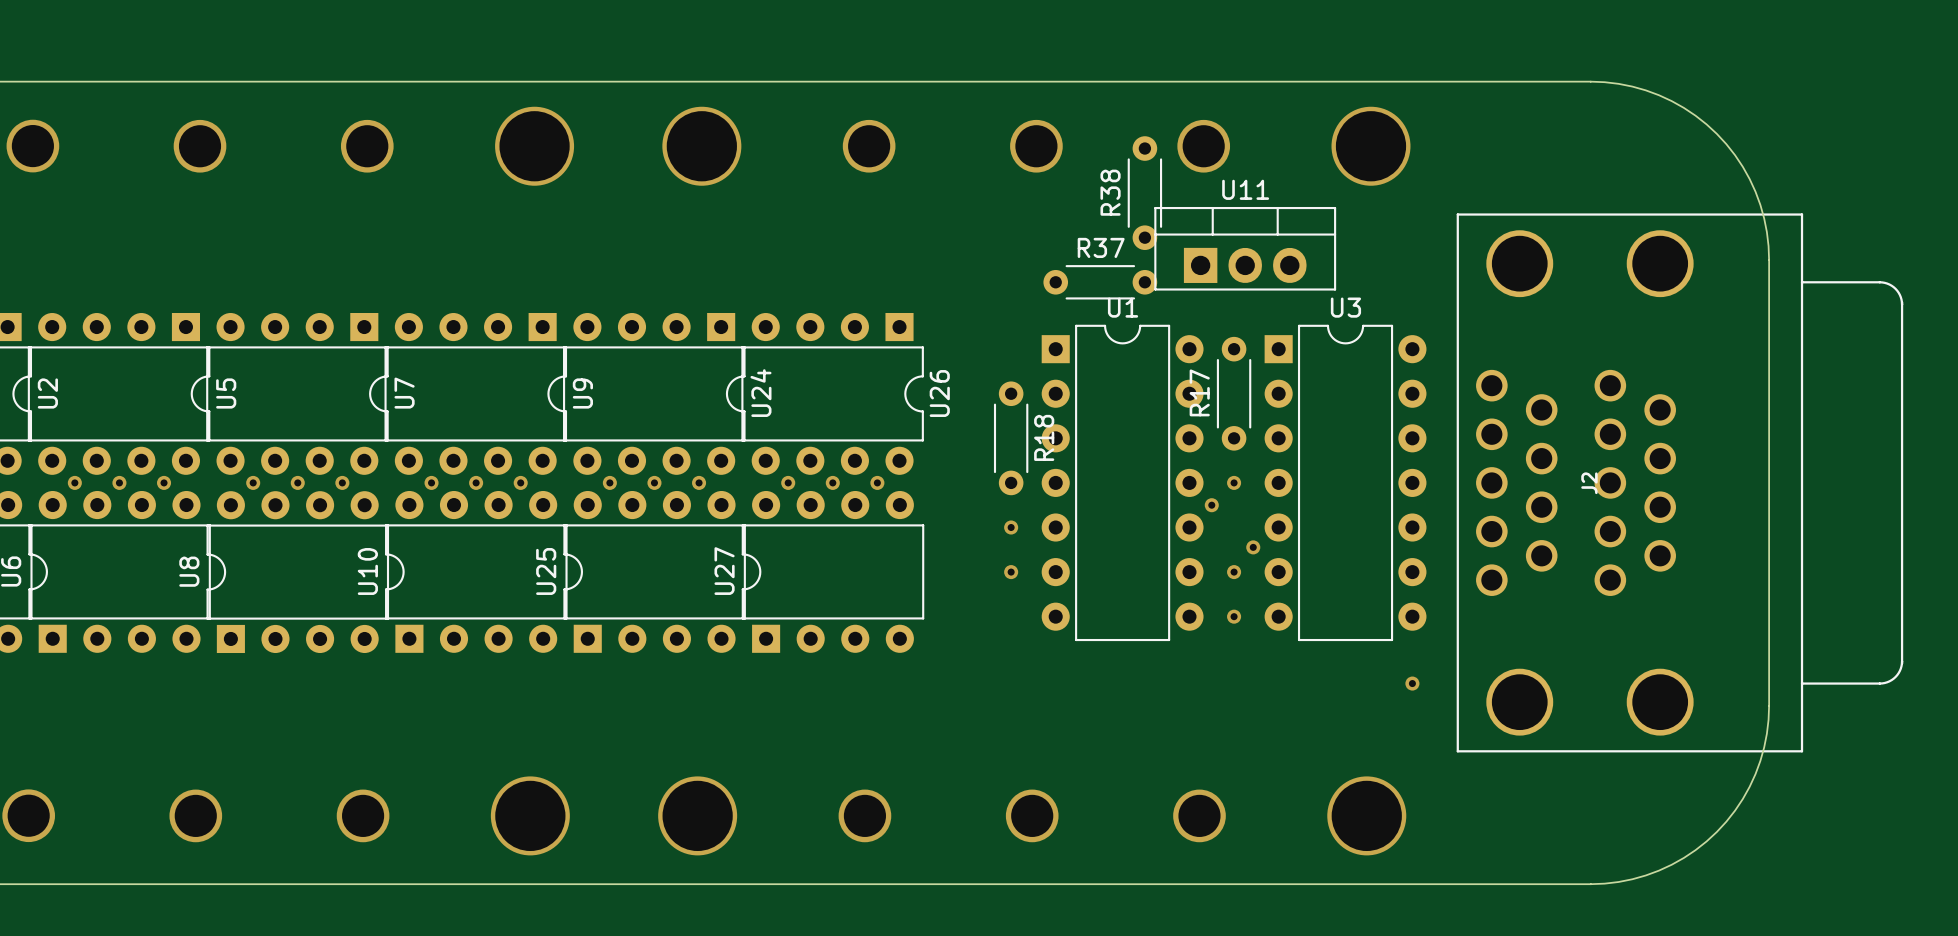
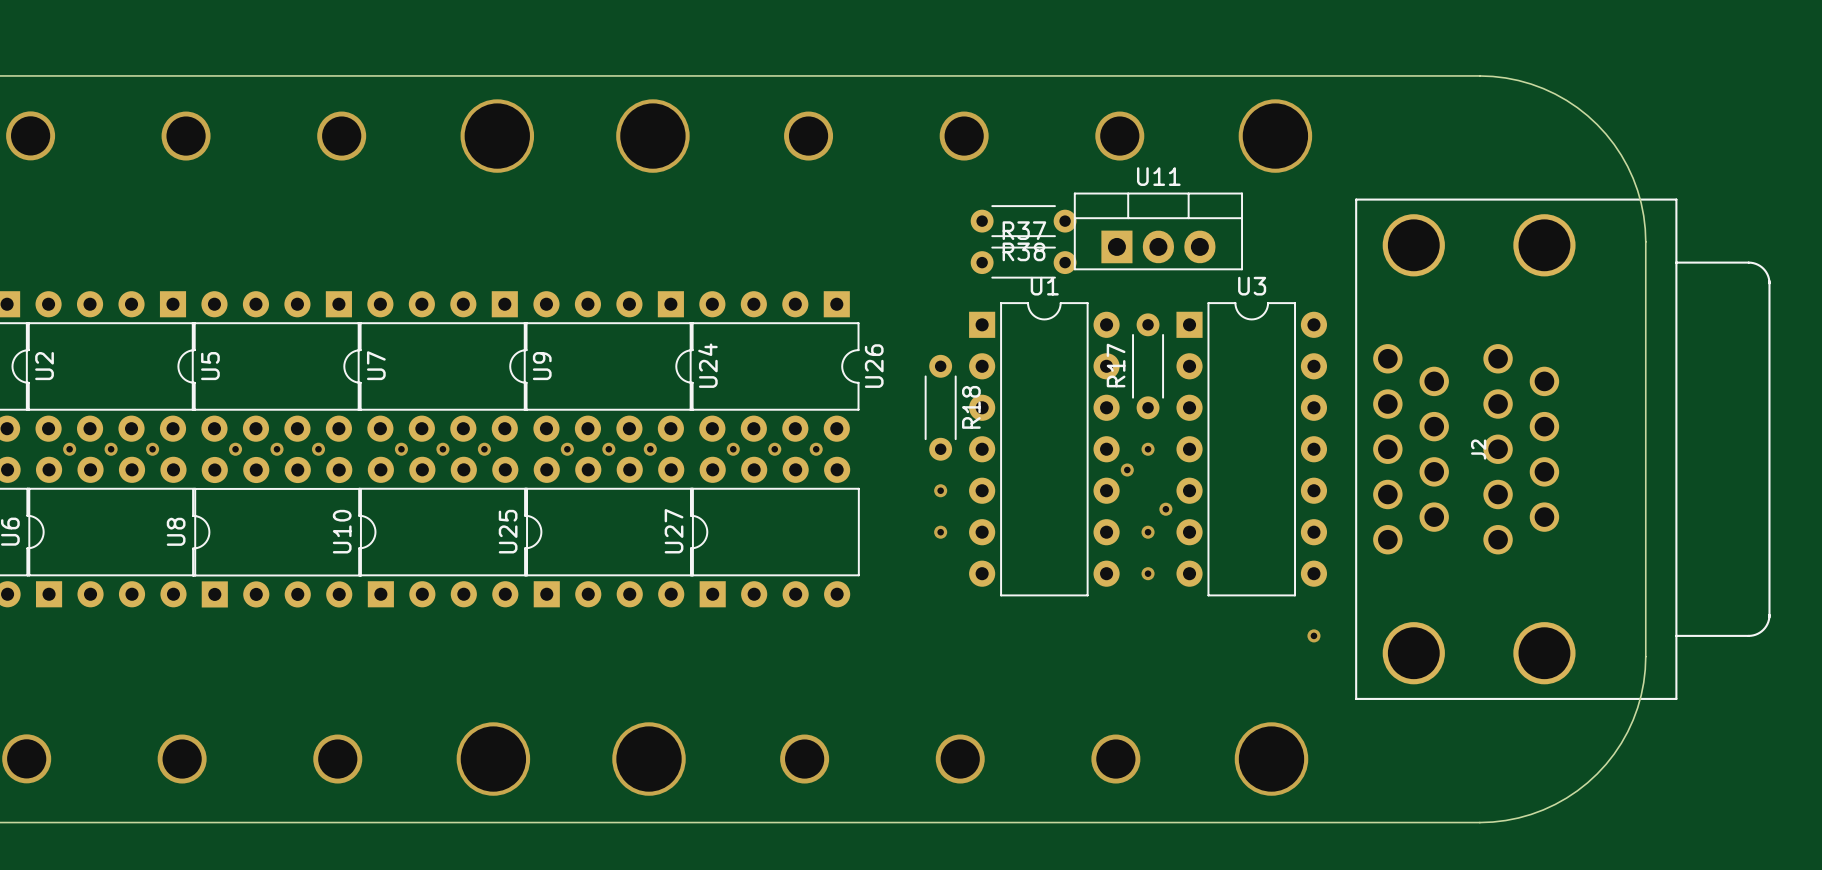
R38 name position: R38 (1110, 192) -> R38 (1024, 251)
R38 rotation: 0° (1144, 193) -> 90° clockwise (1023, 221)

